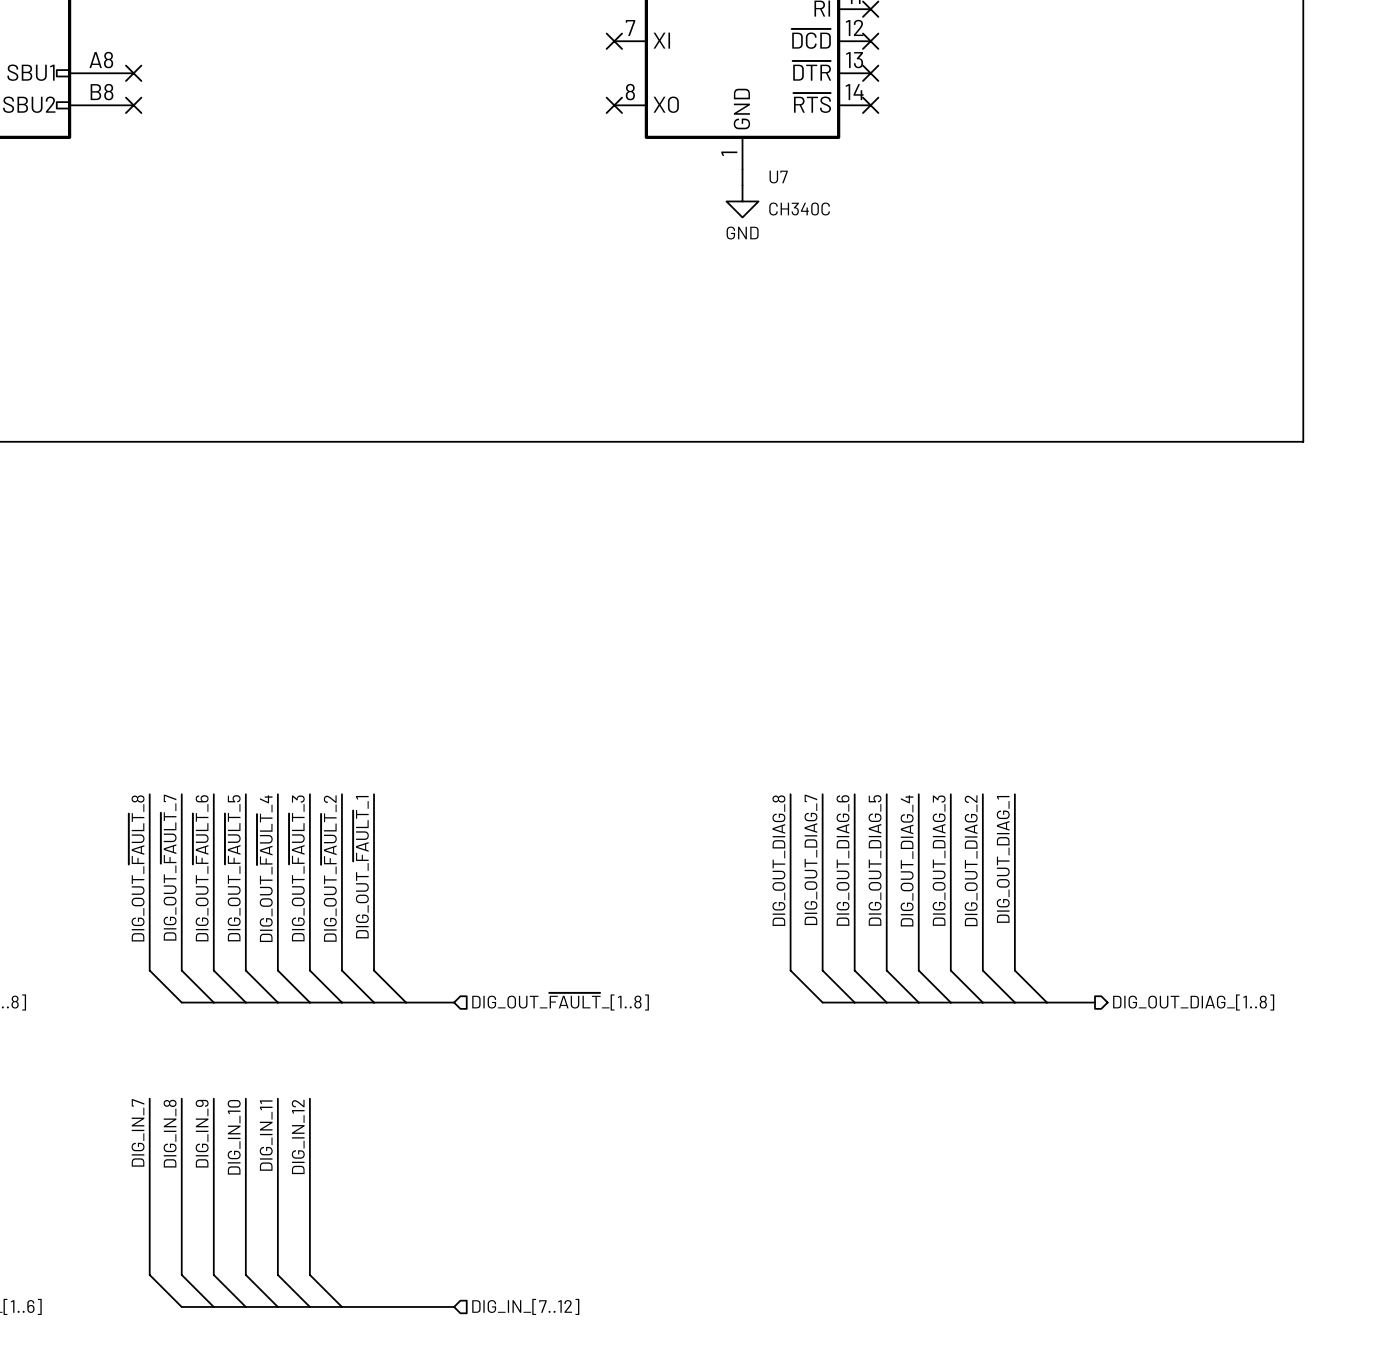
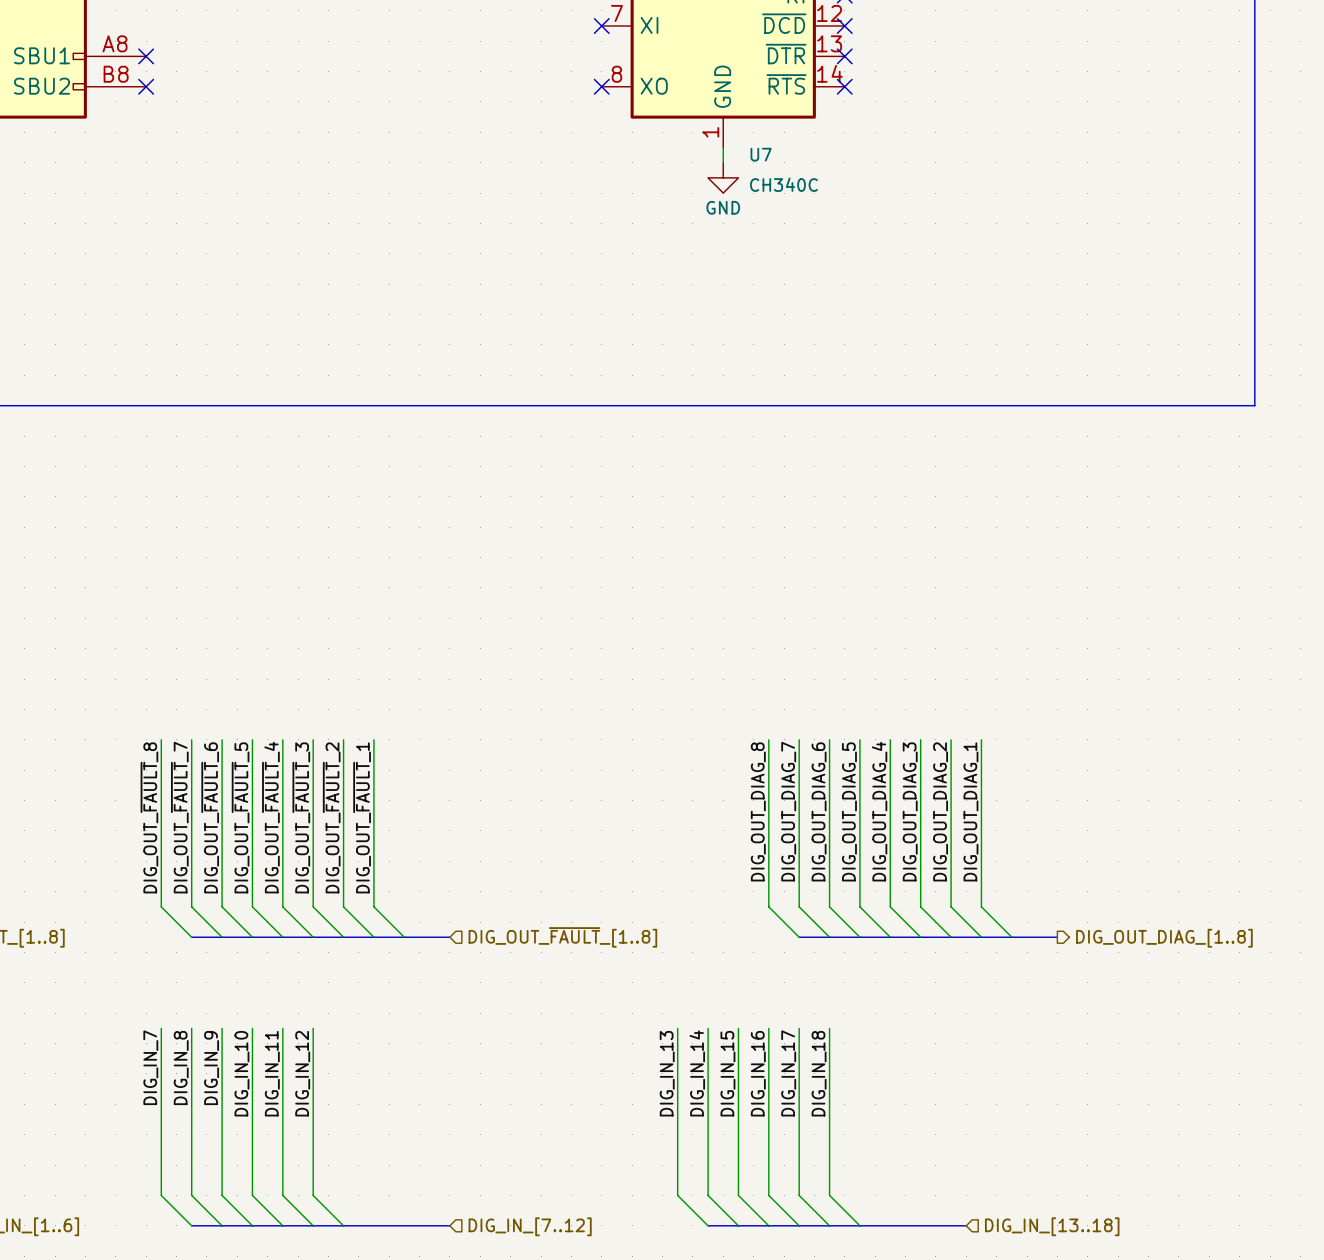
wire: none -> (677, 1028) (677, 1195) (708, 1225)
wire: none -> (708, 1028) (708, 1195) (738, 1225)
wire: none -> (738, 1028) (738, 1195) (768, 1225)
wire: none -> (768, 1028) (768, 1195) (799, 1225)
wire: none -> (799, 1028) (799, 1195) (829, 1225)
wire: none -> (829, 1028) (829, 1195) (859, 1225)
label: none -> DIG_IN_13 (667, 1073)
label: none -> DIG_IN_15 (727, 1073)
label: none -> DIG_IN_16 (758, 1073)
label: none -> DIG_IN_17 (788, 1073)
label: none -> DIG_IN_18 (819, 1073)
label: none -> DIG_IN_14 (697, 1073)
bus: none -> (708, 1225) (966, 1225)
hierarchical label: none -> DIG_IN_[13..18] (1052, 1226)

